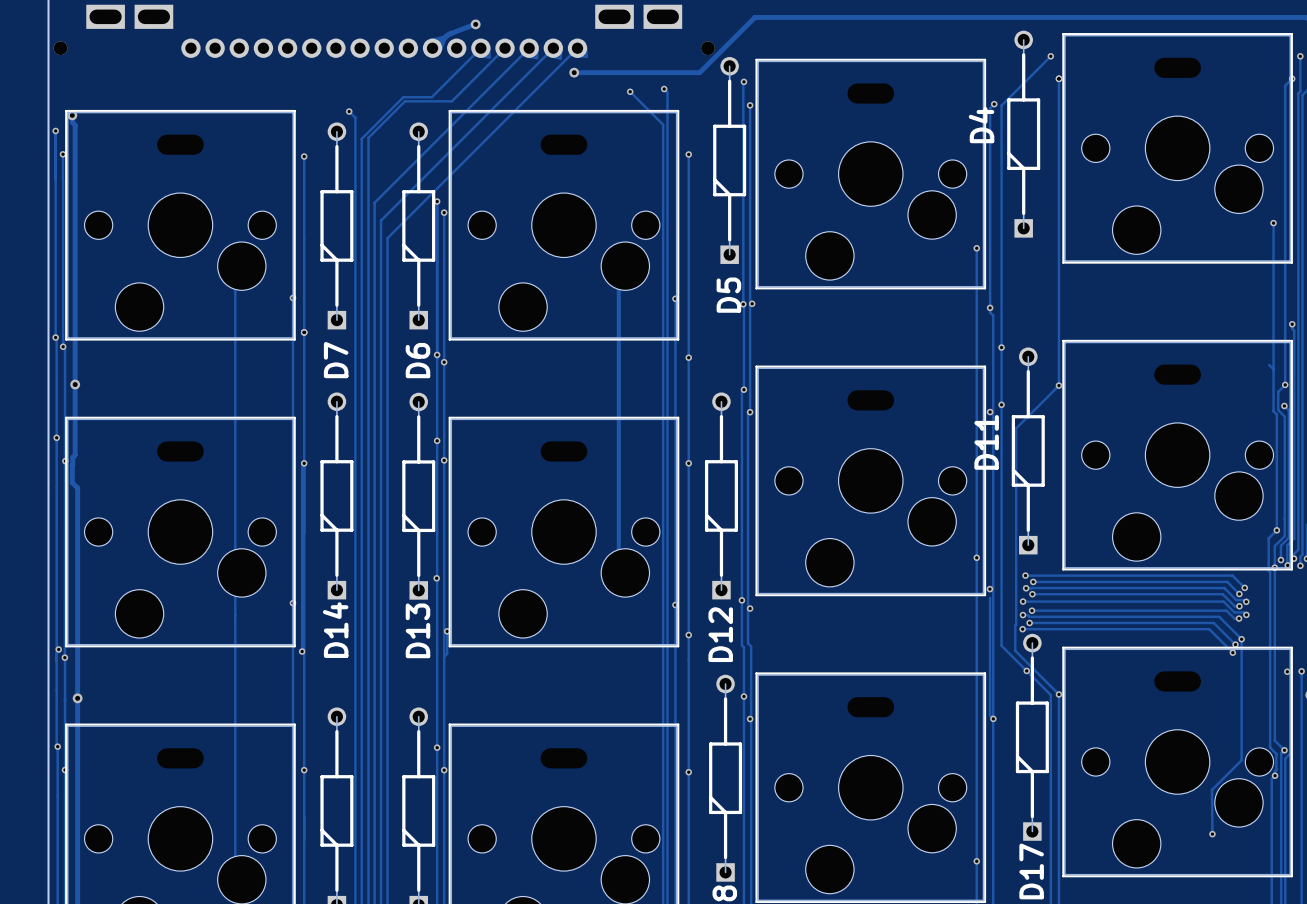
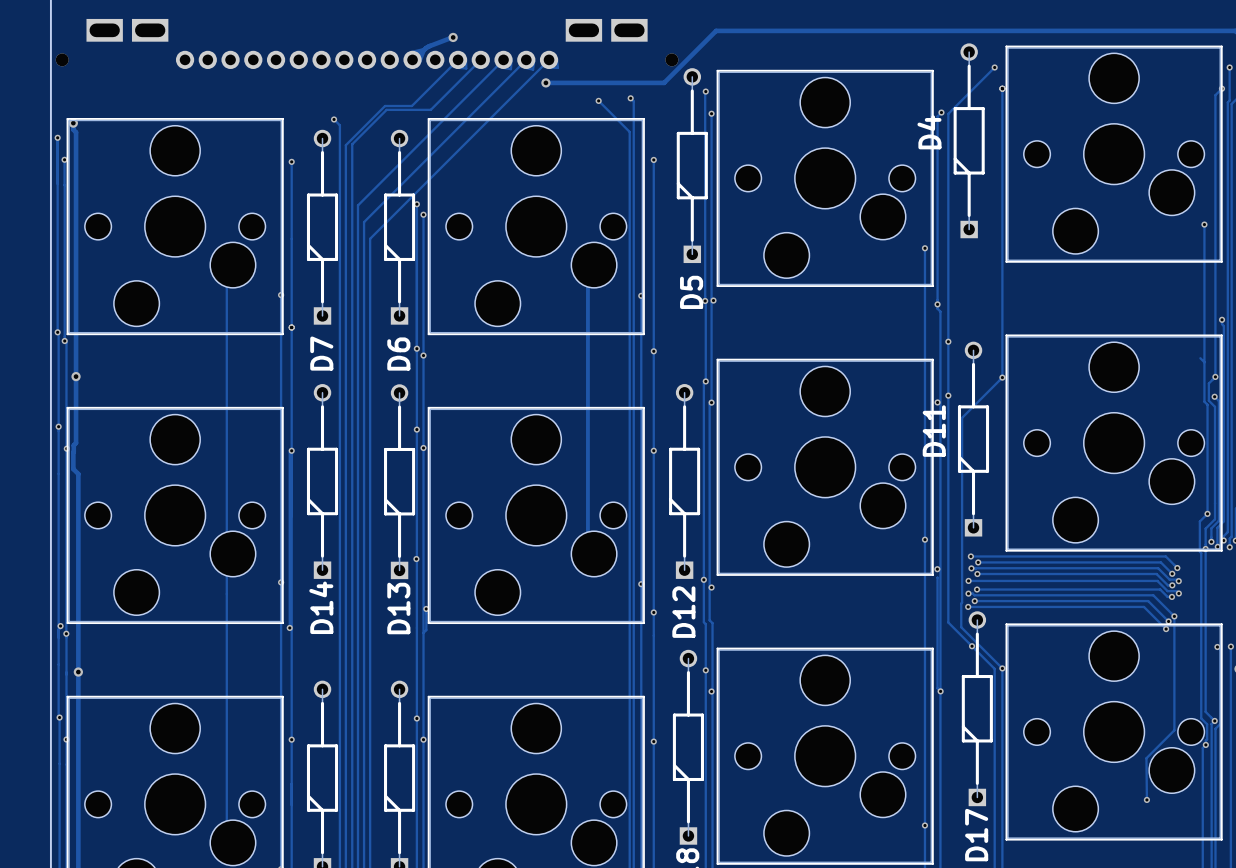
part footprint: [1154, 57, 1201, 78] -> [1089, 53, 1140, 104]
part footprint: [847, 83, 895, 104] -> [800, 77, 851, 128]
part footprint: [157, 134, 204, 155] -> [150, 125, 201, 176]
part footprint: [540, 134, 588, 155] -> [511, 125, 562, 176]
part footprint: [1154, 364, 1201, 385] -> [1089, 342, 1140, 393]
part footprint: [847, 390, 895, 411] -> [800, 366, 851, 417]
part footprint: [157, 441, 204, 462] -> [150, 414, 201, 465]
part footprint: [540, 441, 588, 462] -> [511, 414, 562, 465]
part footprint: [1154, 671, 1201, 692] -> [1089, 631, 1140, 682]
part footprint: [847, 697, 895, 718] -> [800, 655, 851, 706]
part footprint: [157, 748, 204, 769] -> [150, 703, 201, 754]
part footprint: [540, 748, 588, 769] -> [511, 703, 562, 754]

